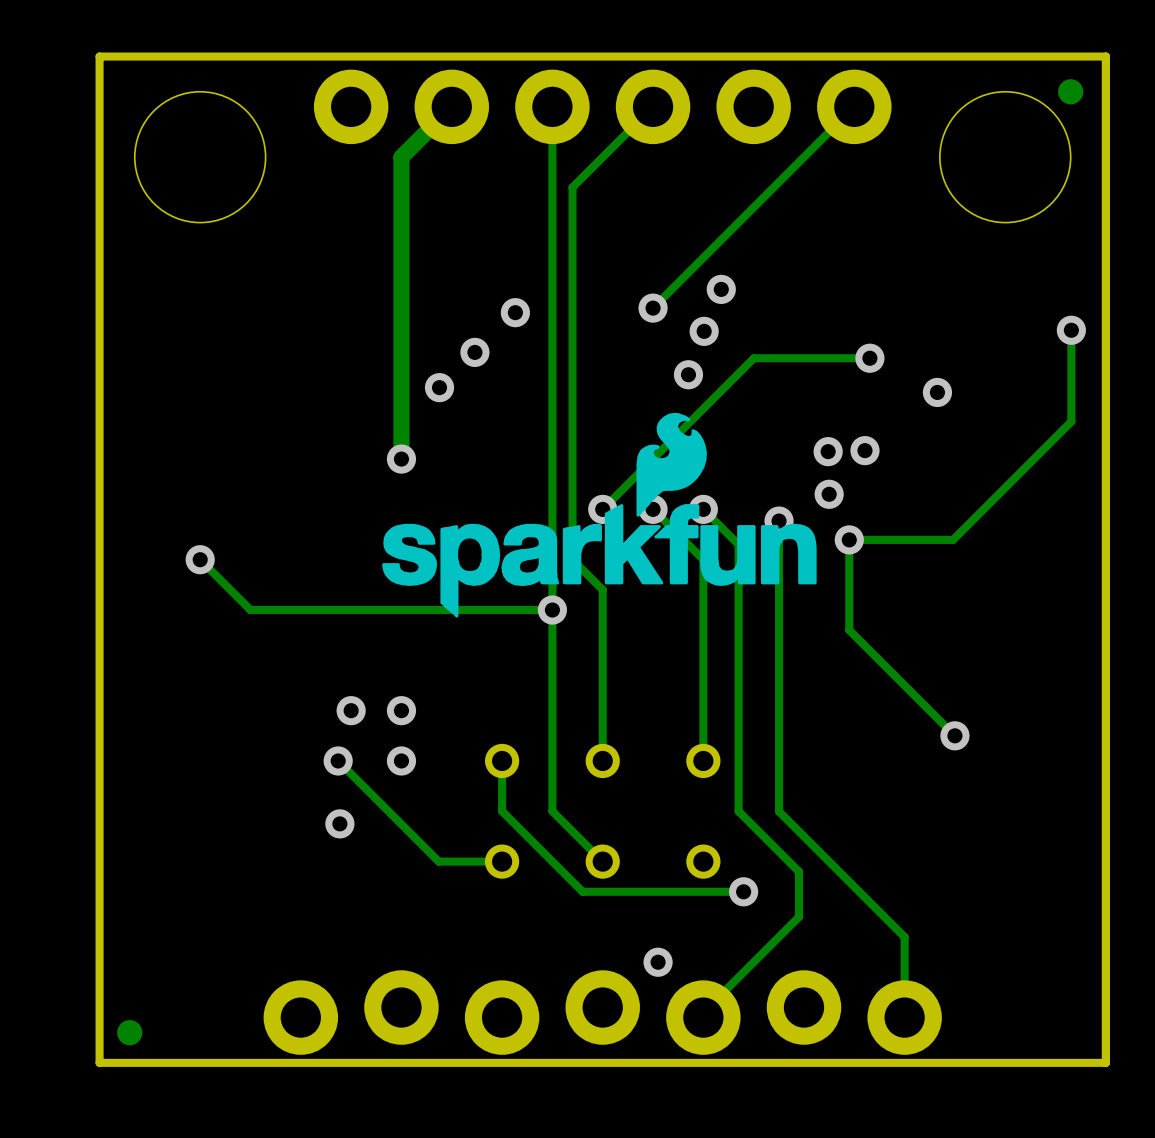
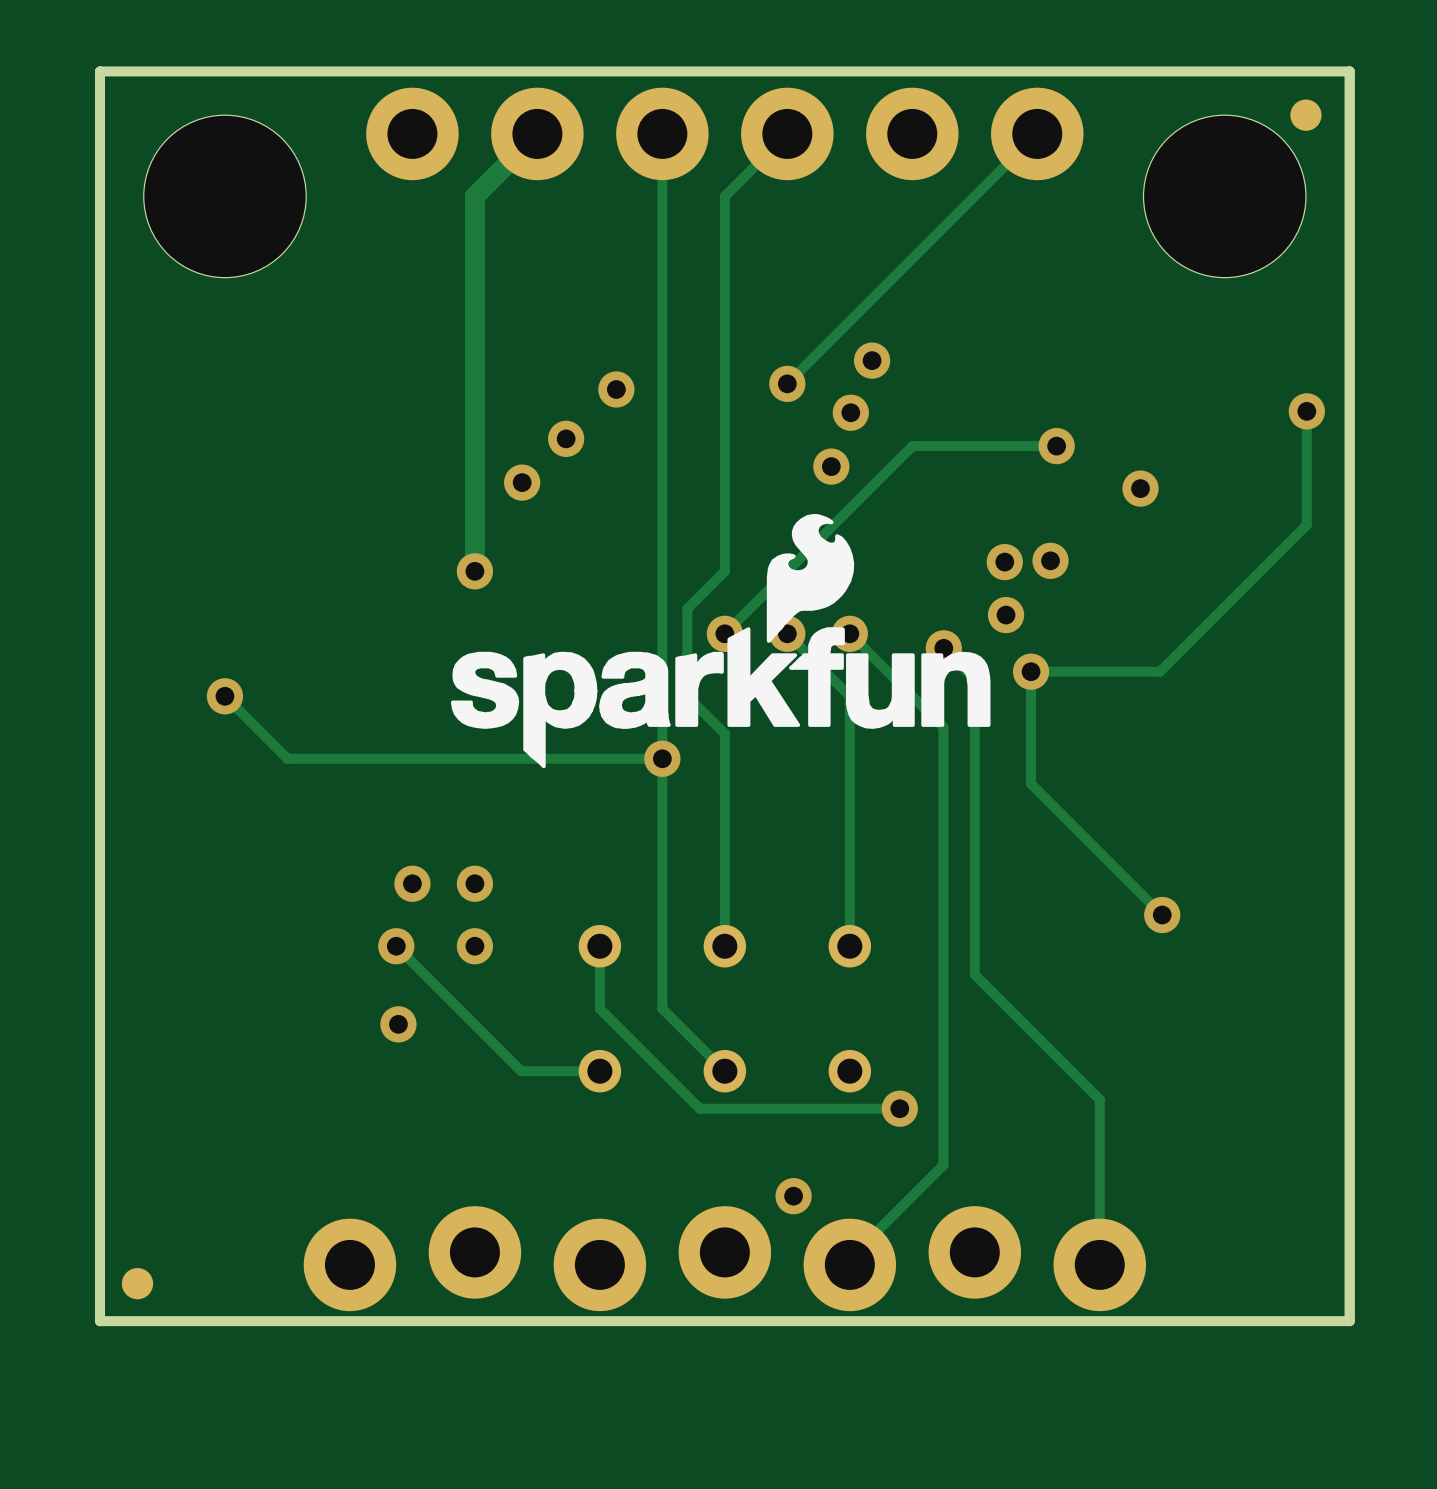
track: (602, 157) (572, 187) (572, 489) -> (724, 196) (724, 571) (687, 608)
track: (779, 521) (779, 811) (904, 937) -> (943, 648) (974, 679) (974, 974) (1099, 1099) (1099, 1164)
track: (738, 544) (738, 811) (798, 871) (798, 916) (778, 937) -> (893, 677) (943, 727) (943, 1165)

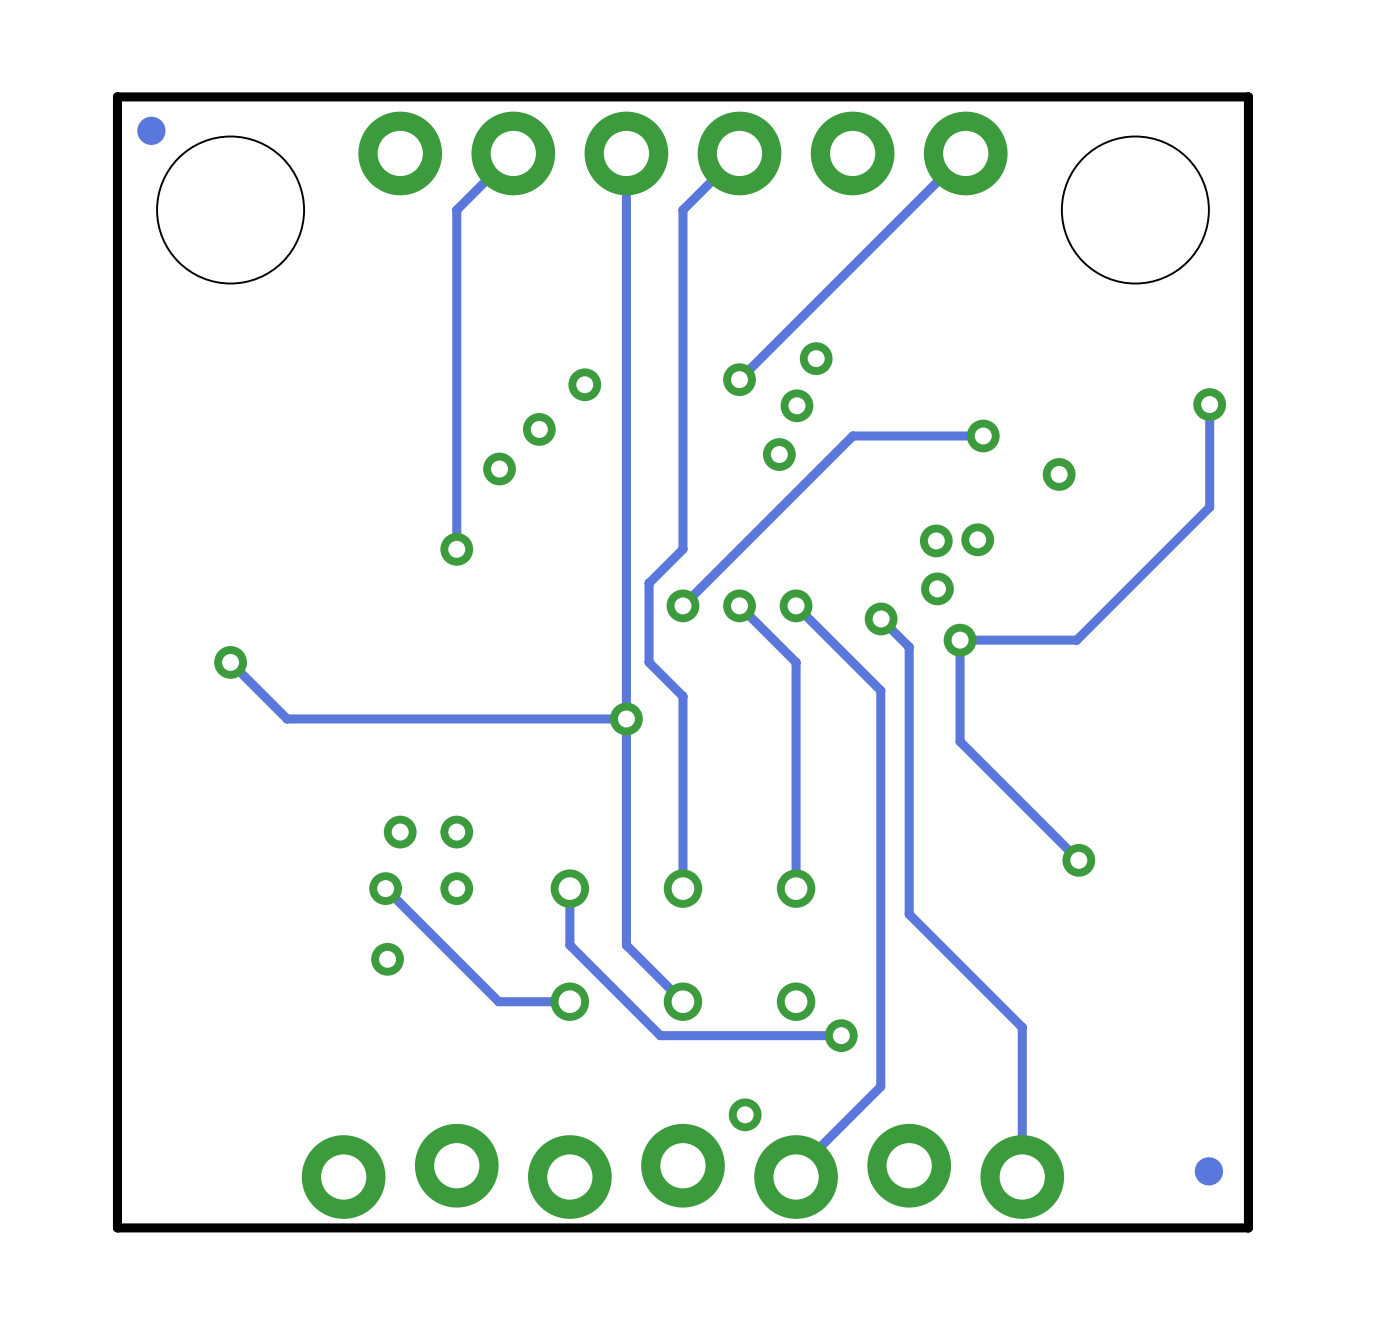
part: none -> (151, 130)
part: (1305, 115) -> none
track width: thick (537, 133) (474, 196) (474, 571) -> thin (513, 153) (456, 210) (456, 549)
drawing: [450, 514, 991, 769] -> none
part: none -> (1208, 1171)
part: (137, 1283) -> none

